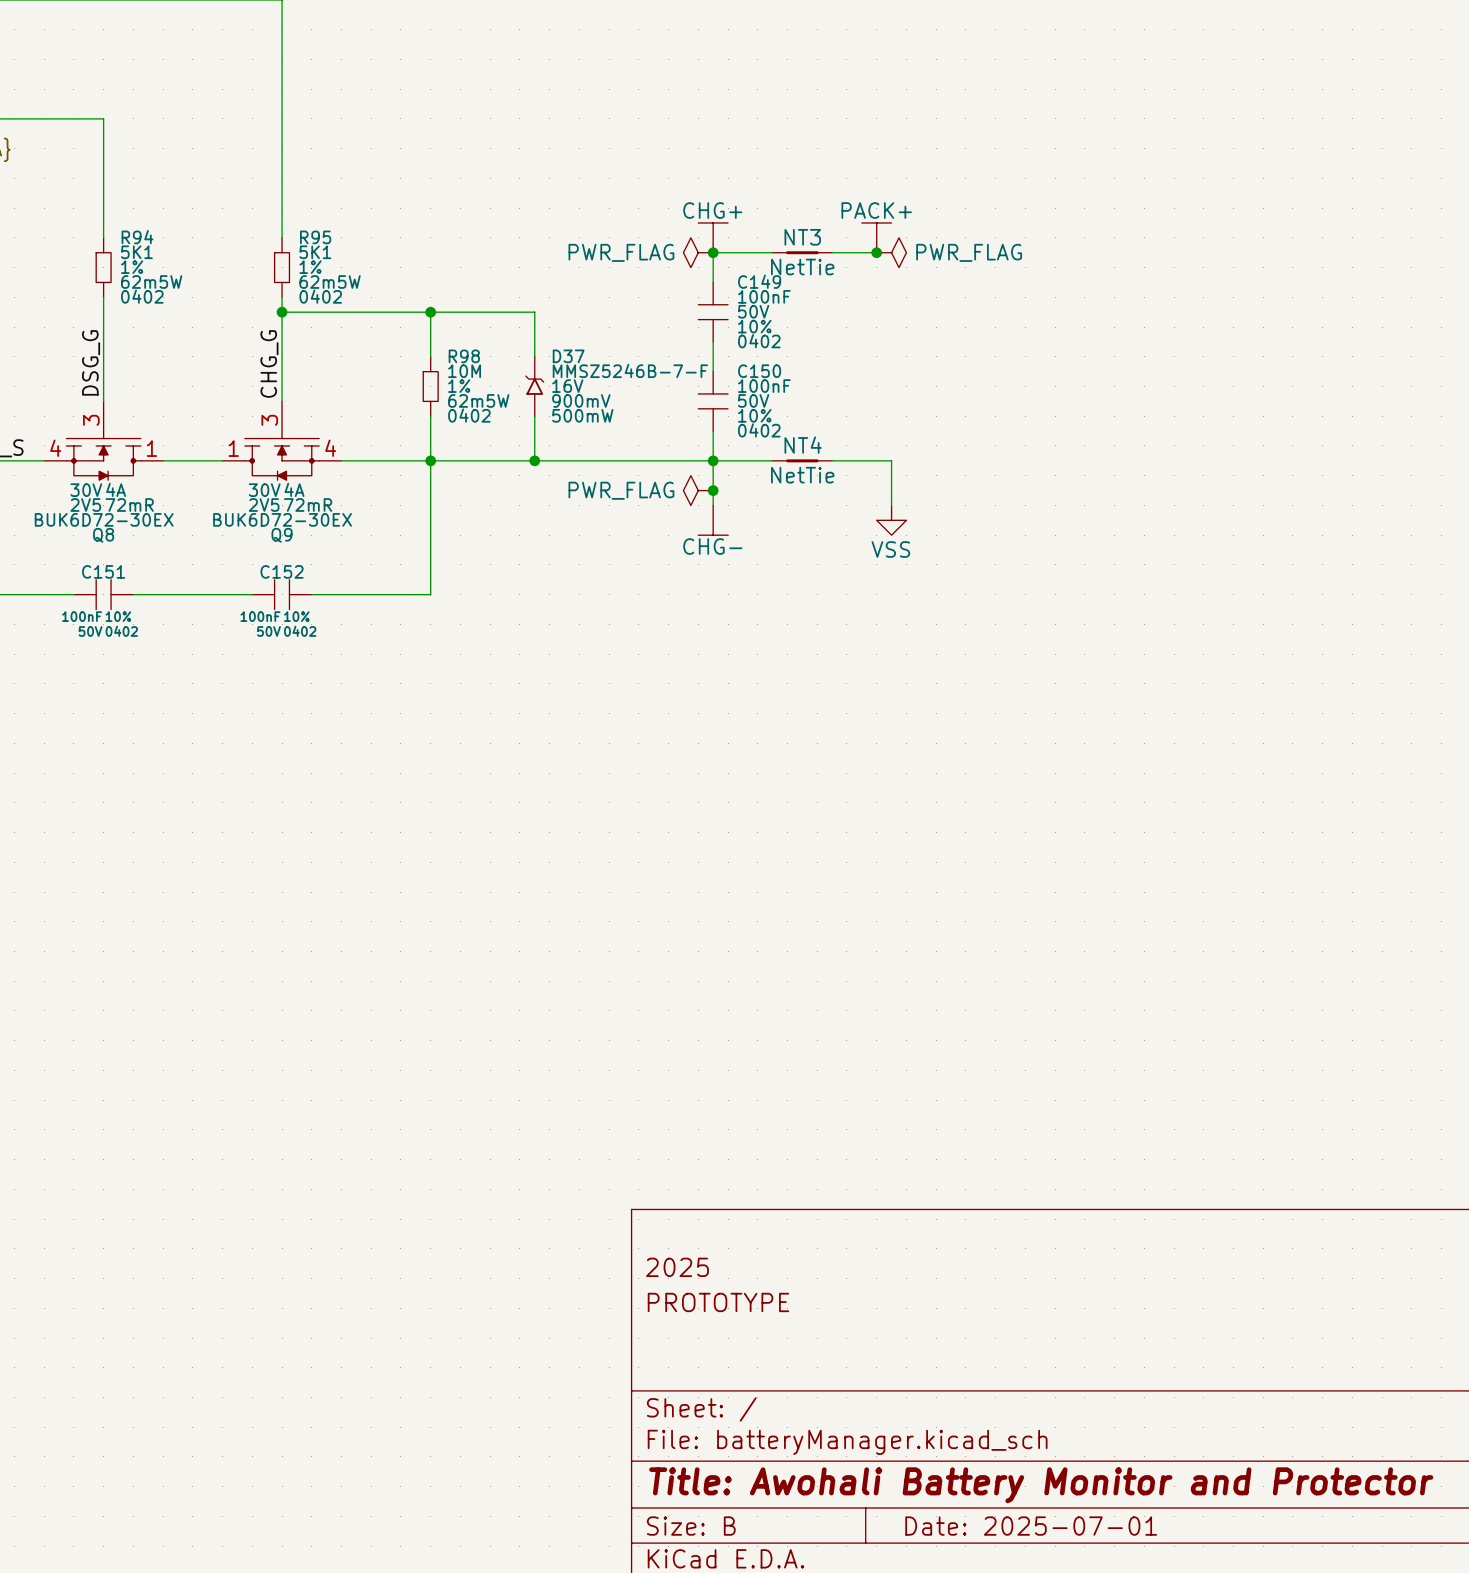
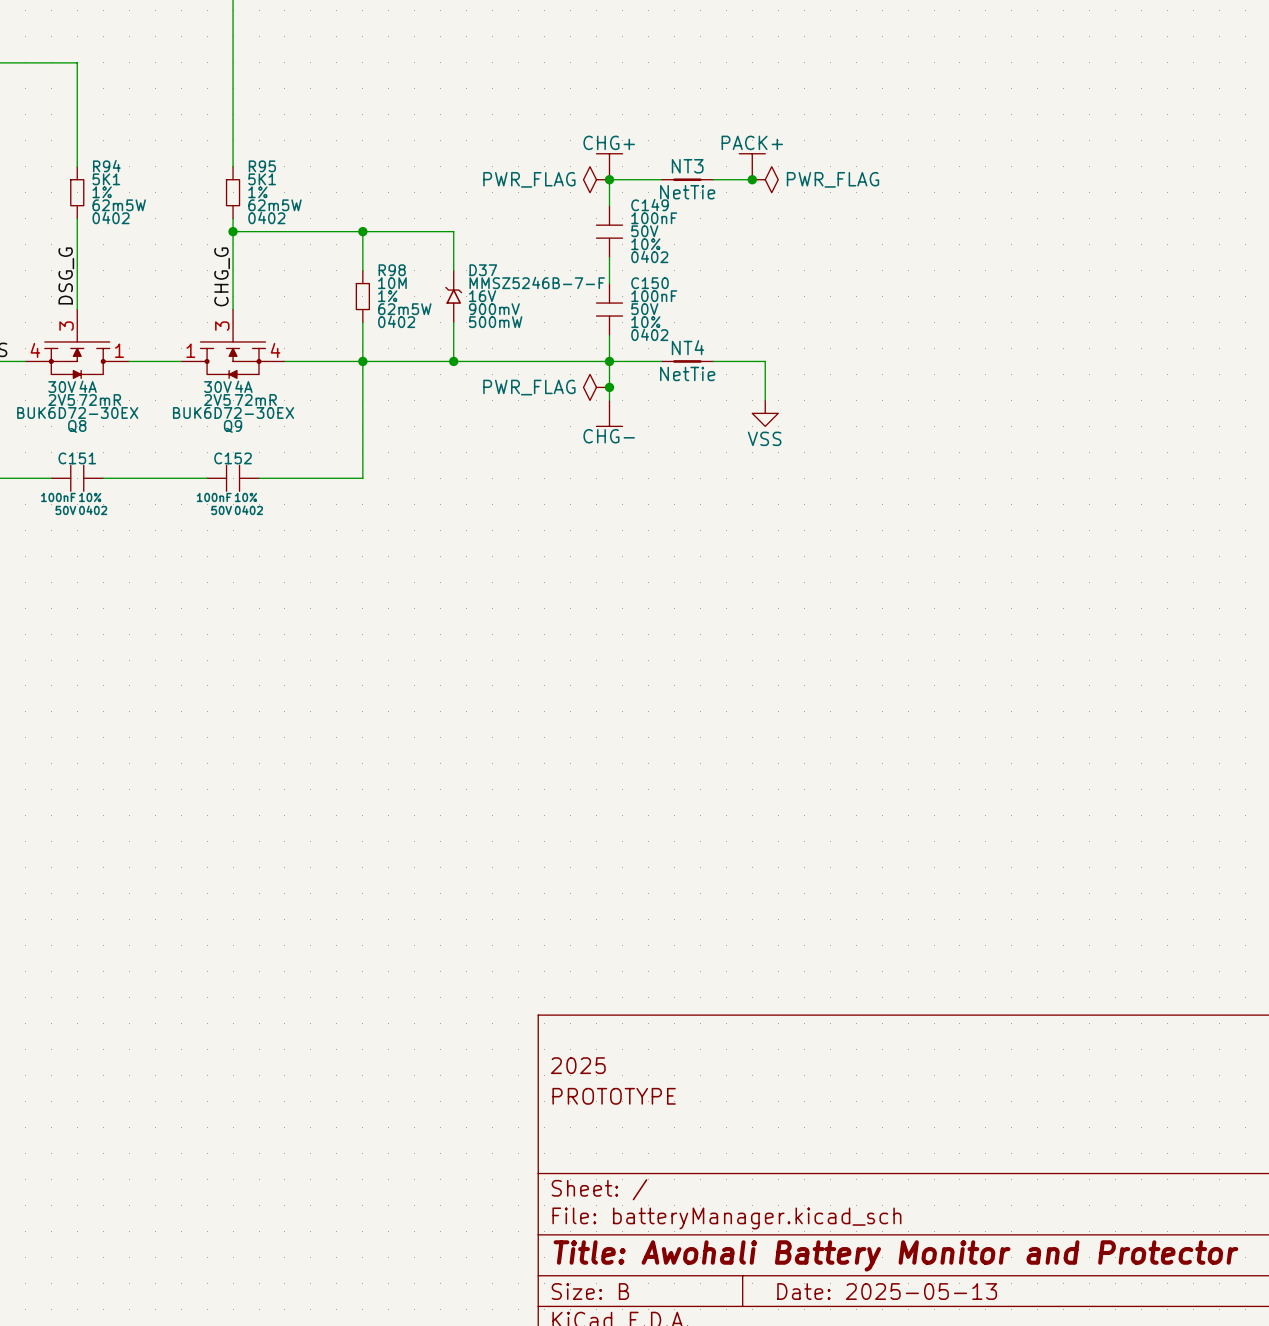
title block: Date: 2025-07-01 (1031, 1526) -> Date: 2025-05-13 (887, 1291)

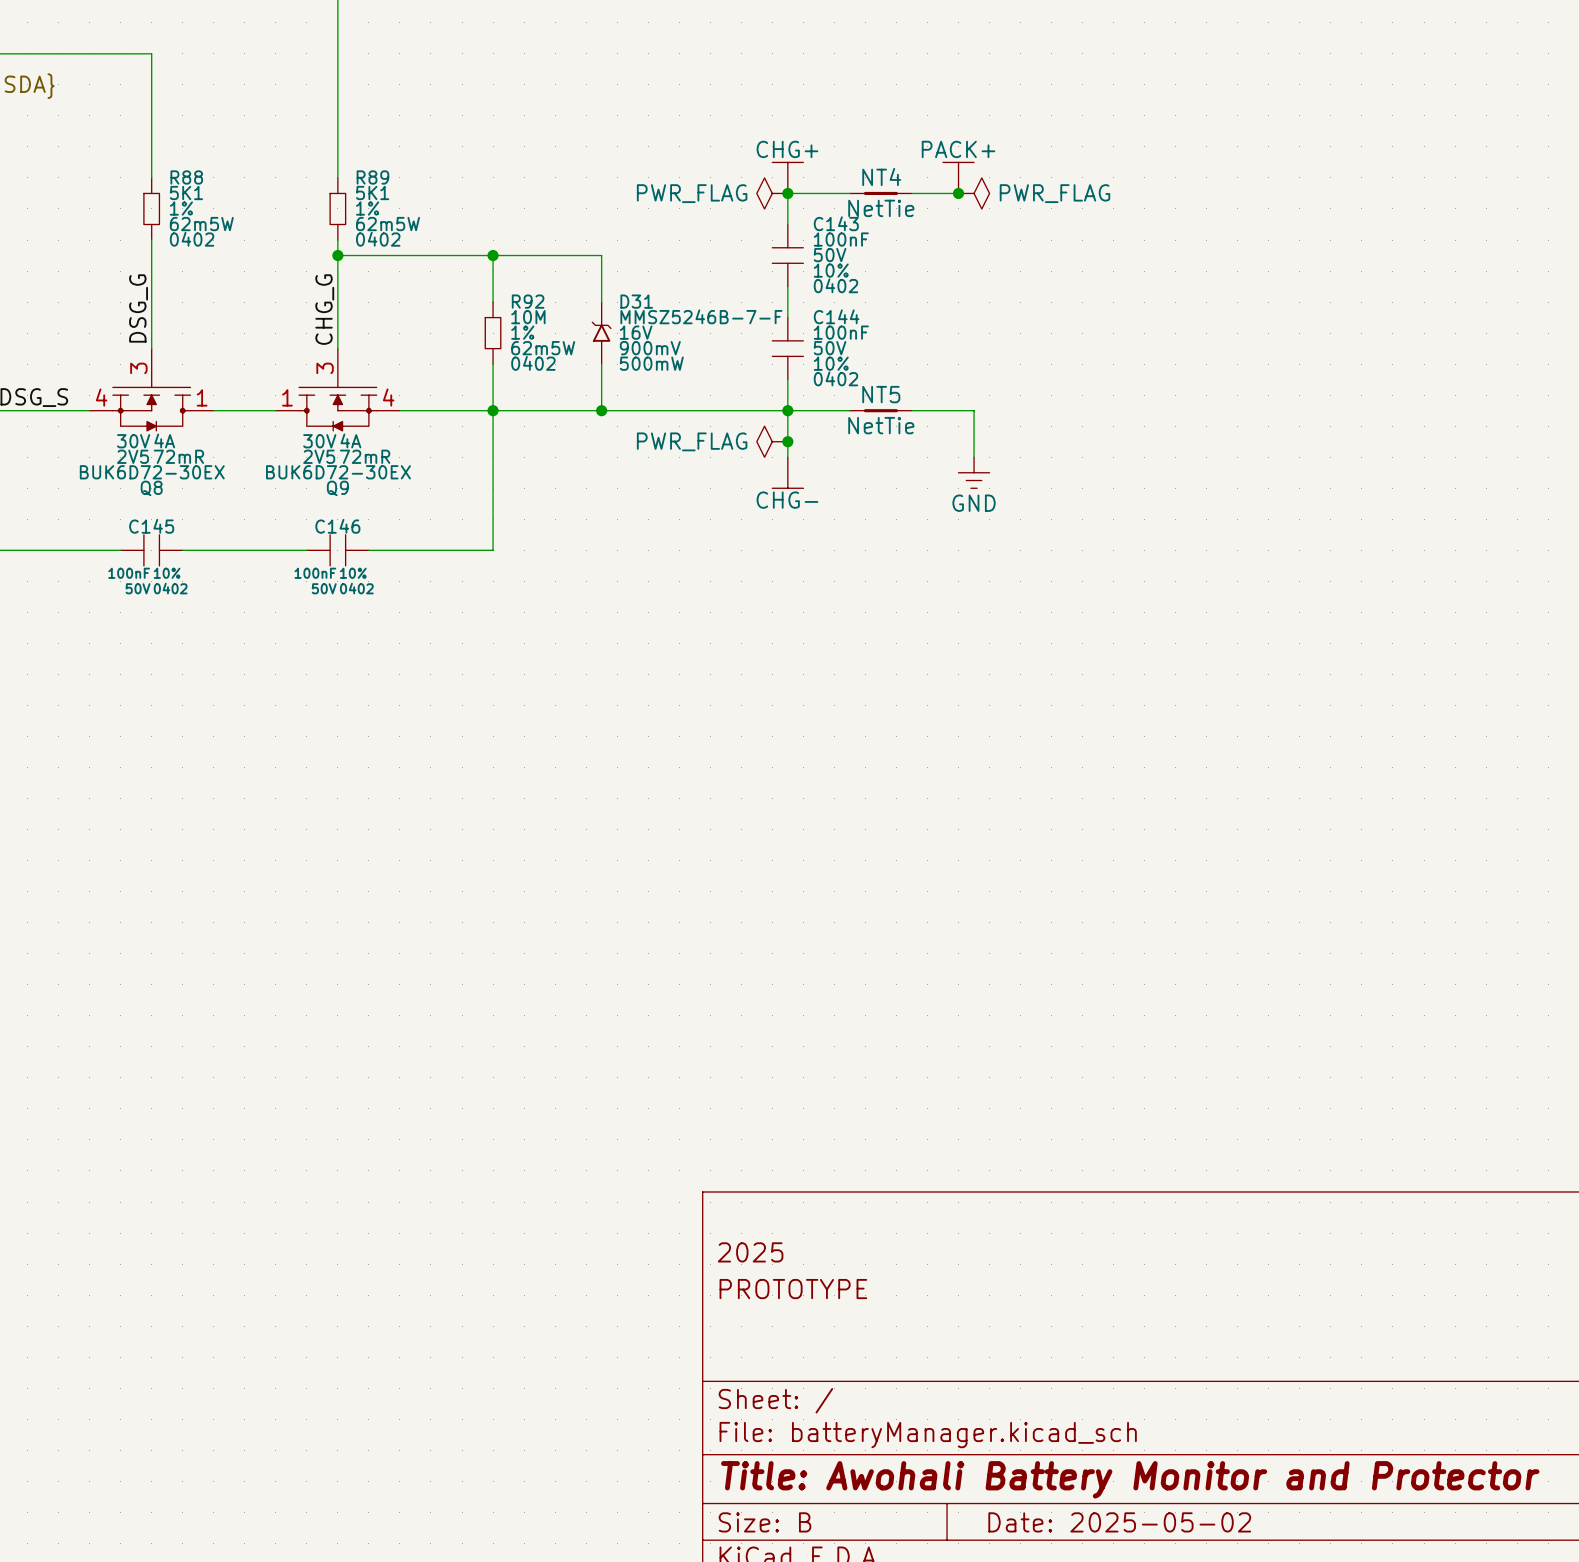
R94 name: R94 (106, 166) -> R88 (186, 177)
R95 name: R95 (262, 166) -> R89 (372, 177)
NT3 name: NT3 (687, 166) -> NT4 (881, 176)
C149 name: C149 (650, 205) -> C143 (836, 223)
R98 name: R98 (392, 270) -> R92 (528, 301)
D37 name: D37 (483, 270) -> D31 (636, 301)
C150 name: C150 (650, 283) -> C144 (836, 316)
NT4 name: NT4 (687, 347) -> NT5 (881, 394)
power symbol: VSS (765, 413) -> GND (974, 472)
C151 name: C151 (77, 458) -> C145 (151, 526)
C152 name: C152 (233, 458) -> C146 (337, 526)
title block: Date: 2025-05-13 (887, 1291) -> Date: 2025-05-02 (1119, 1522)

